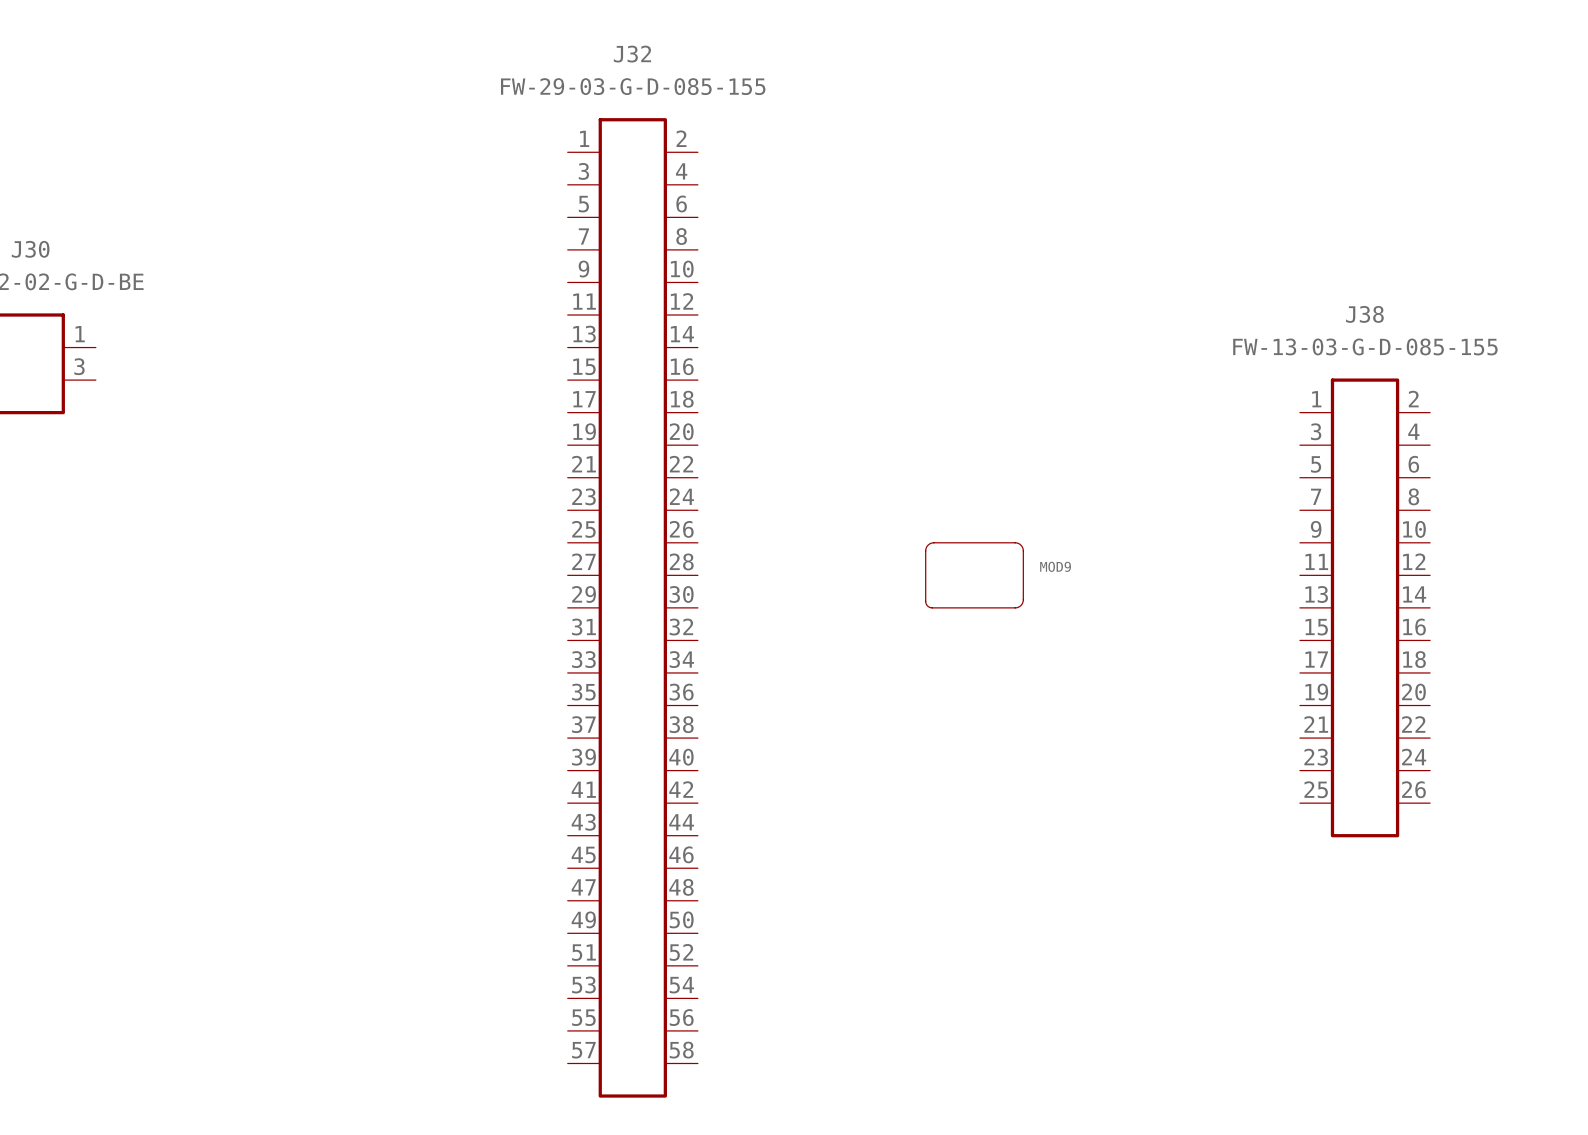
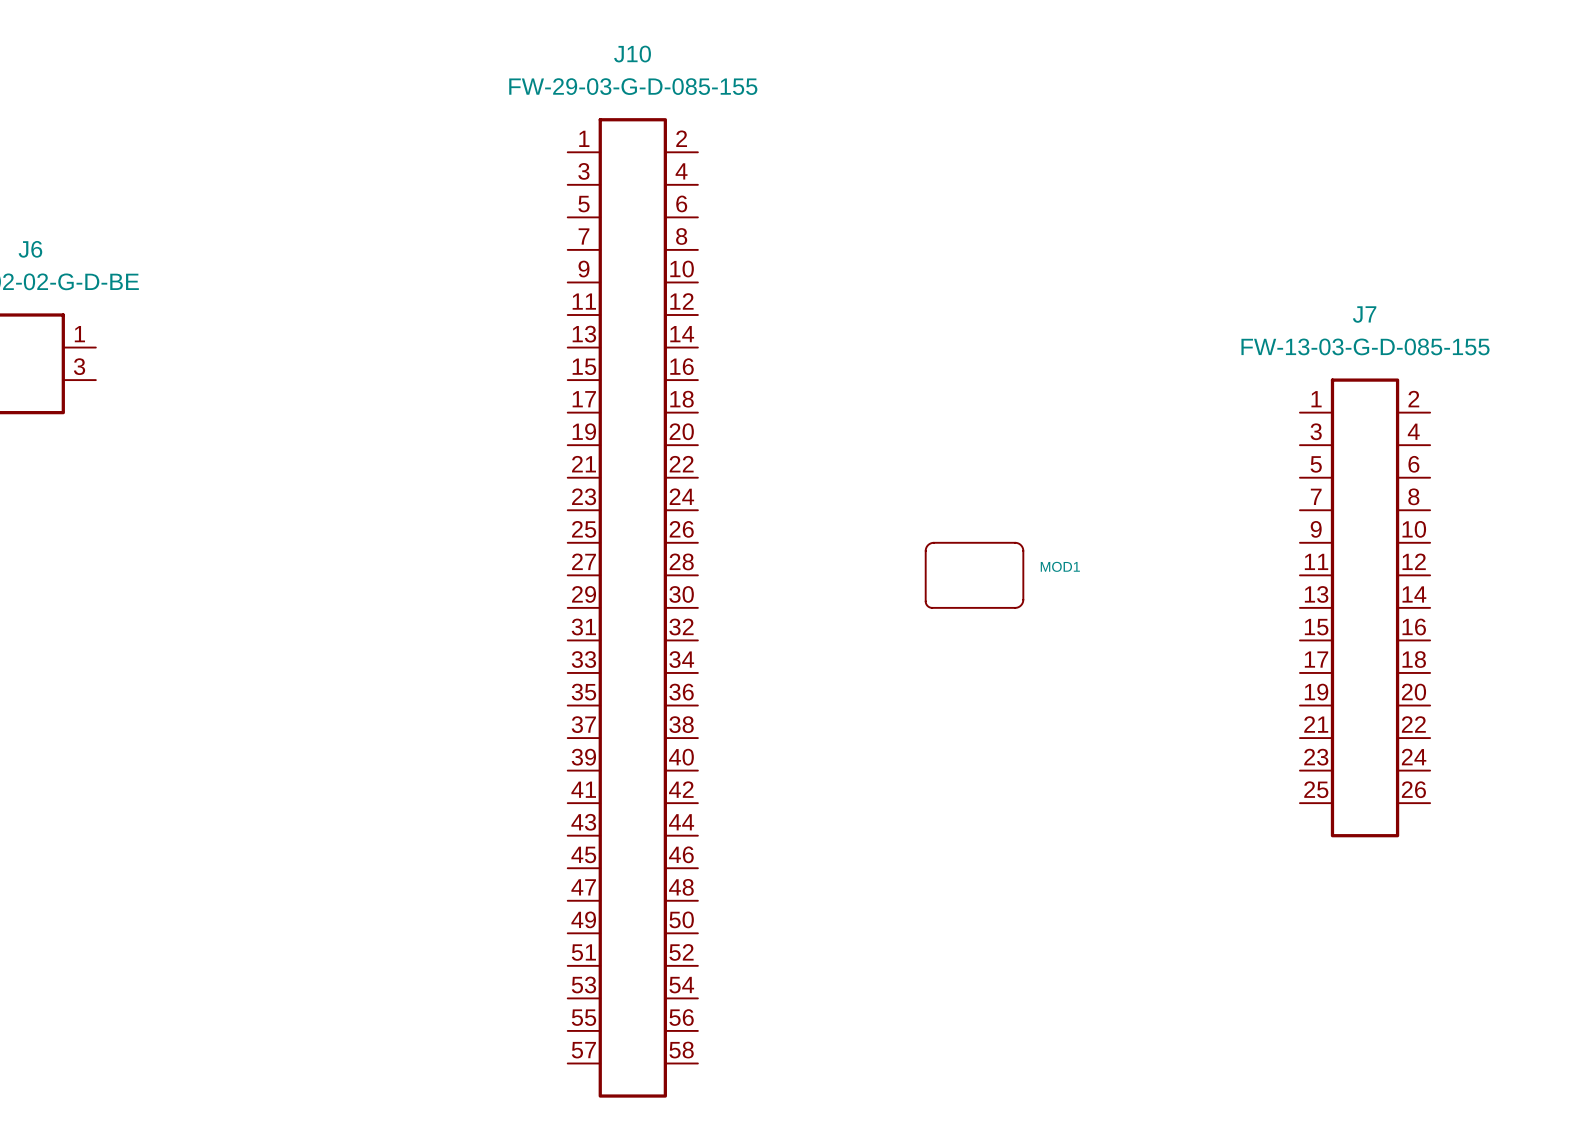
J32 name: J32 (632, 54) -> J10 (632, 54)
J30 name: J30 (30, 249) -> J6 (30, 249)
J38 name: J38 (1364, 314) -> J7 (1364, 314)
MOD9 name: MOD9 (1055, 566) -> MOD1 (1060, 566)

